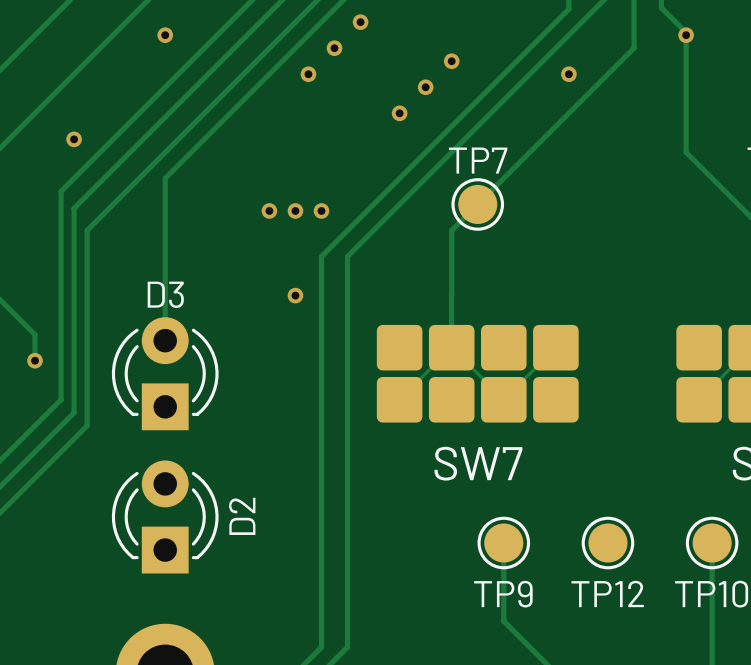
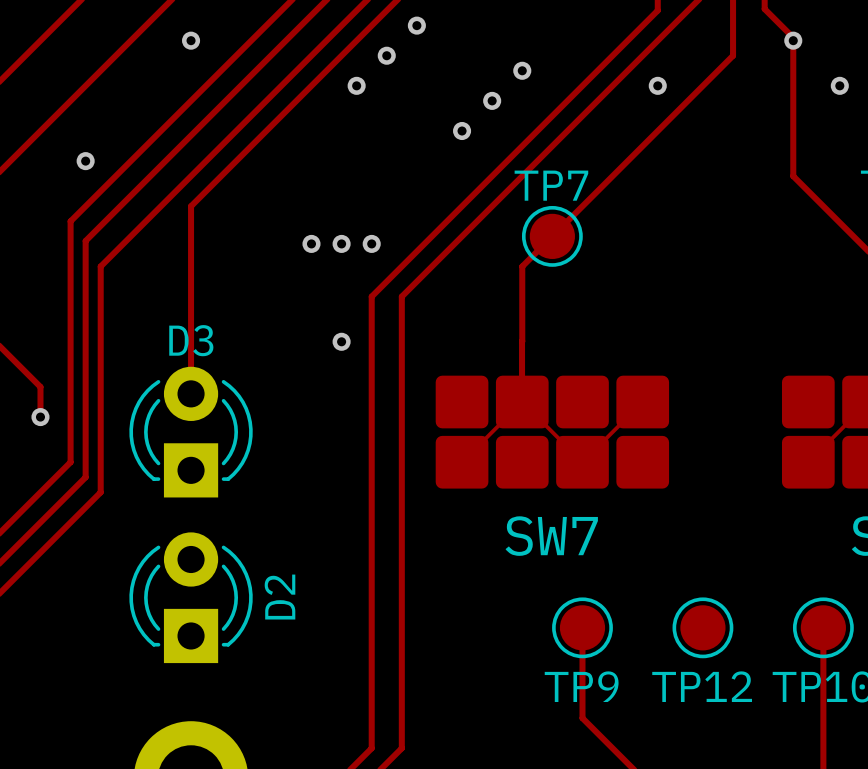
via: none -> (839, 85)

